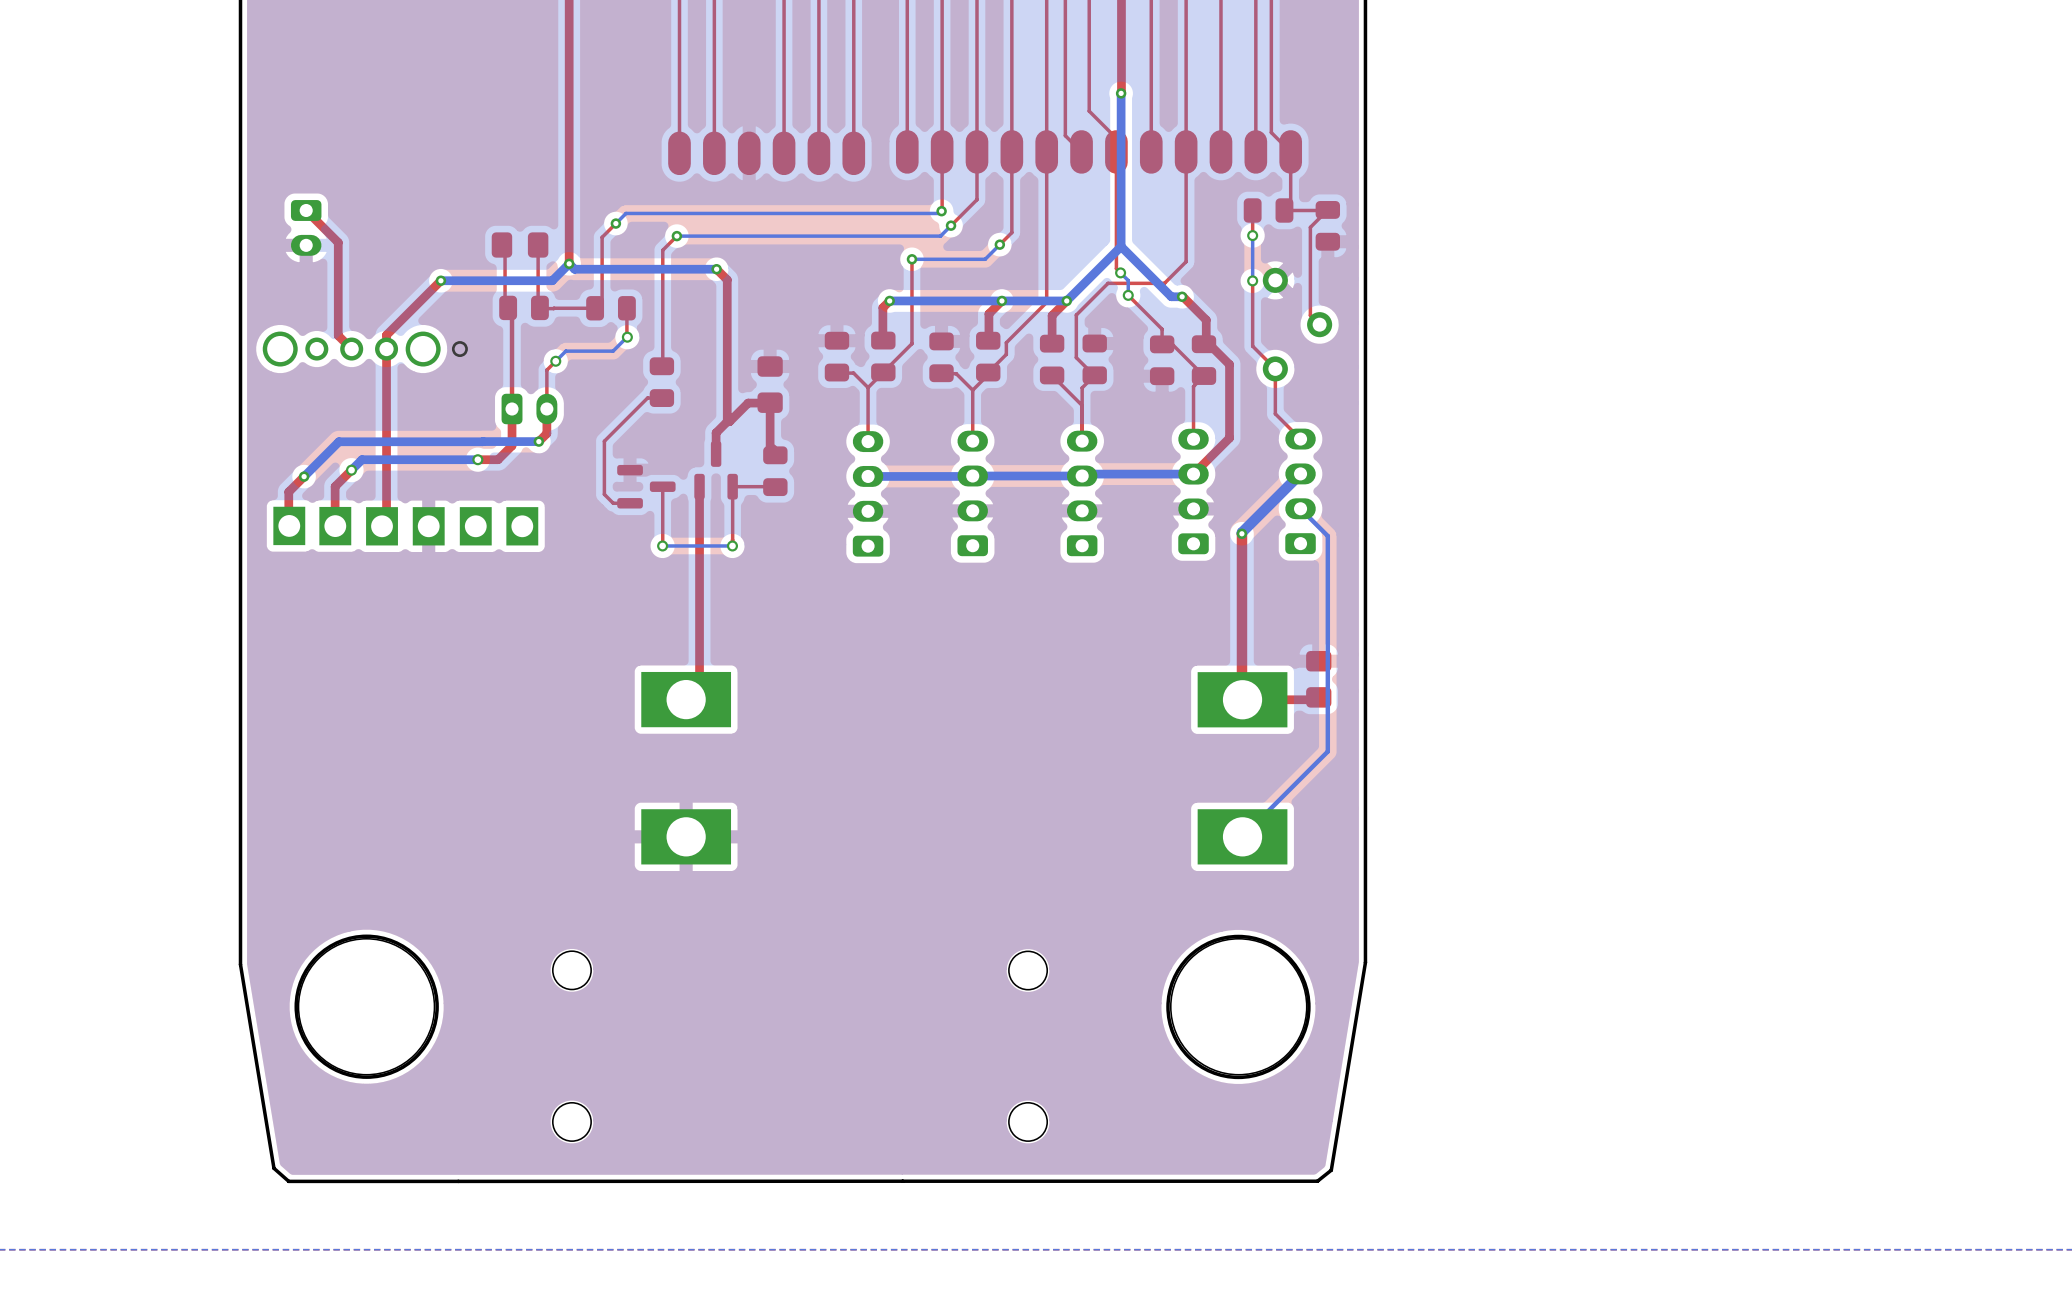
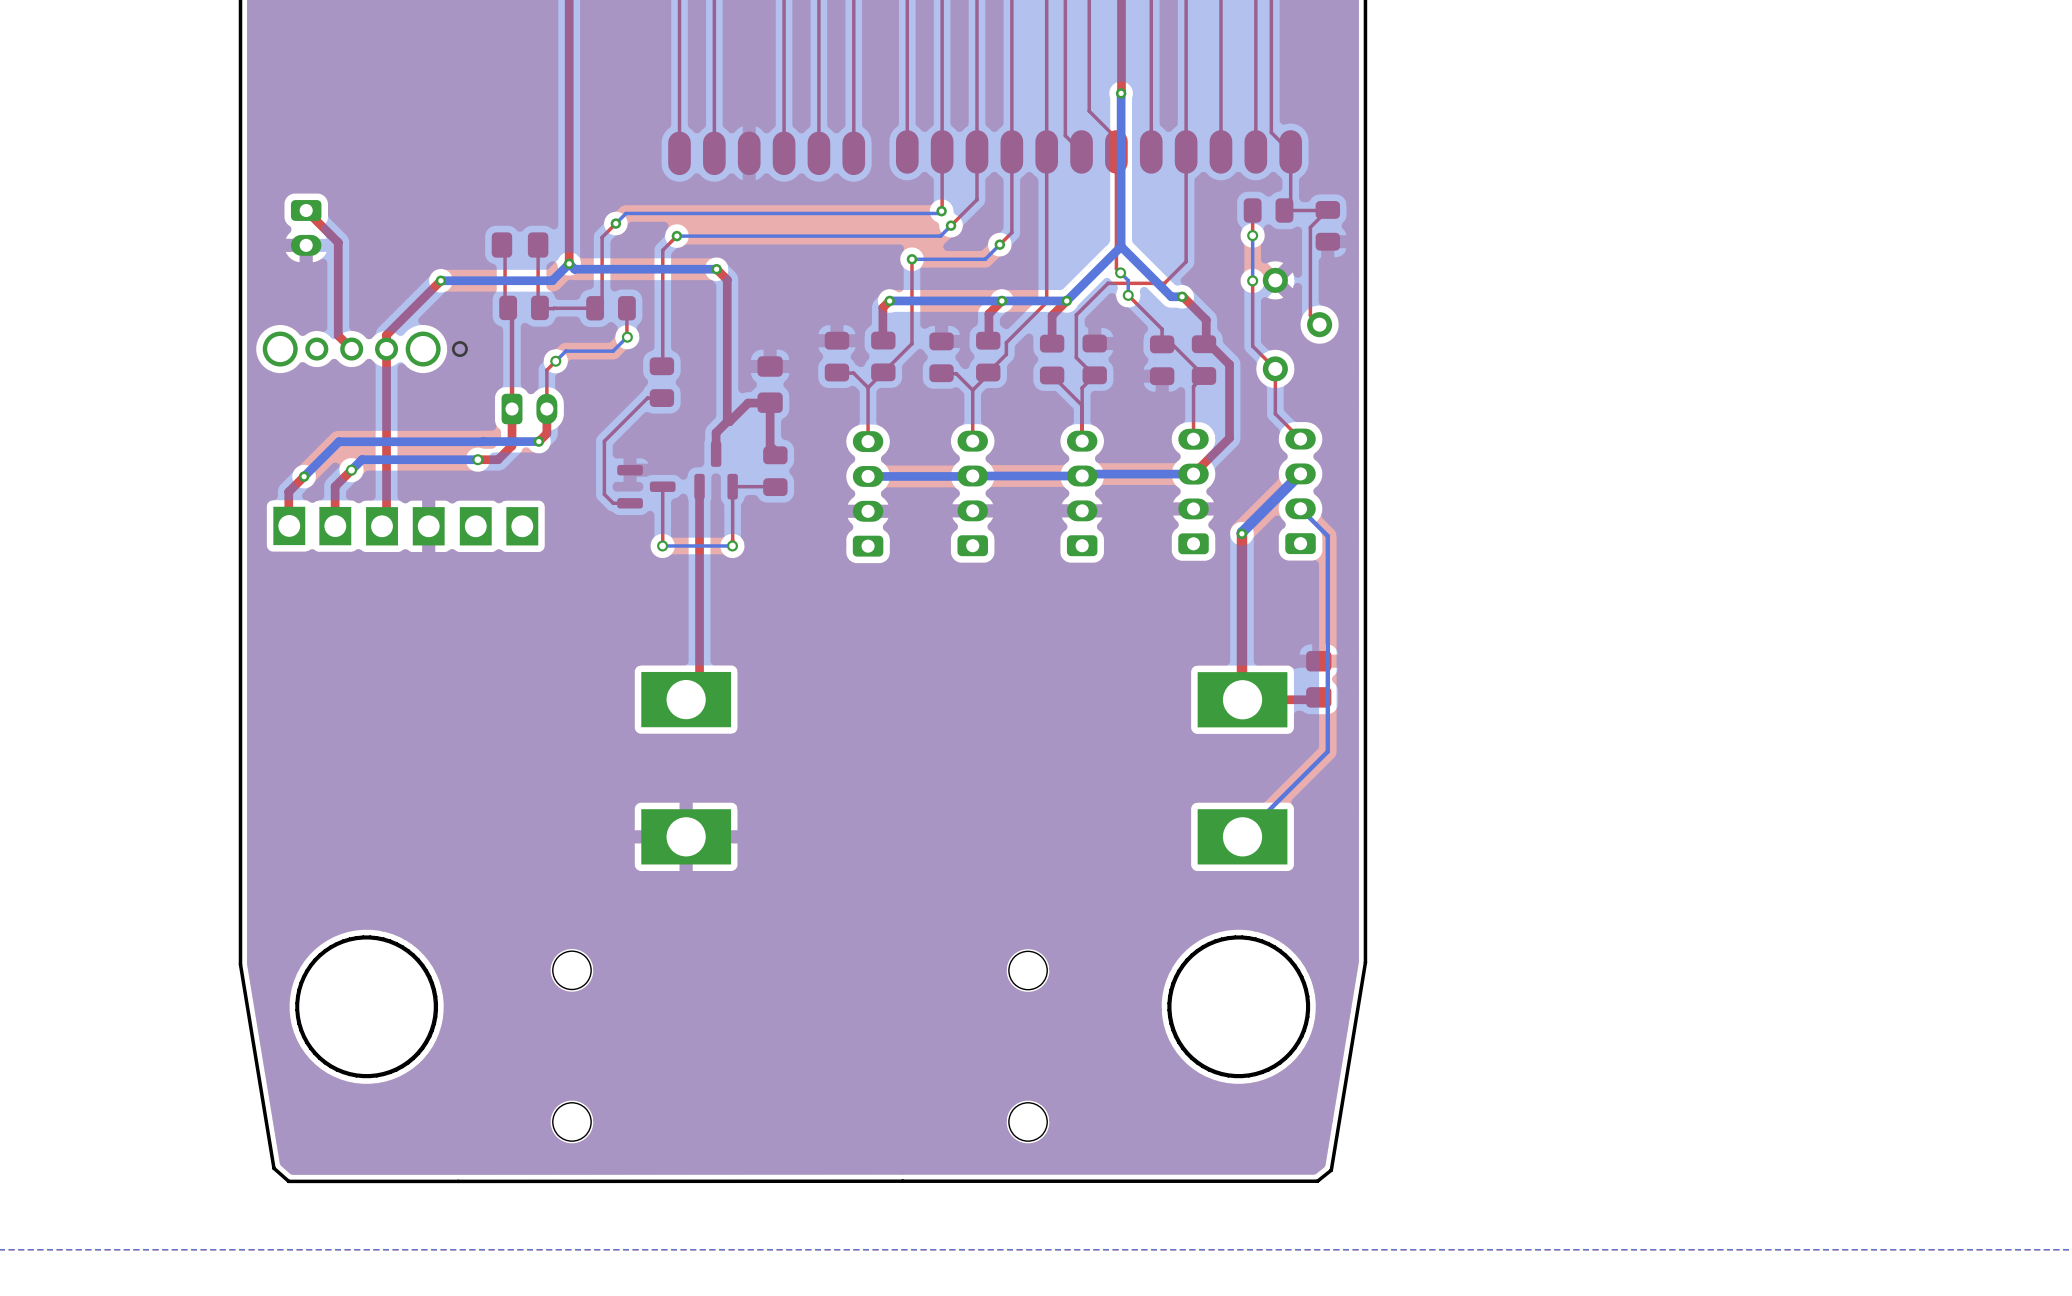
round board edge: [294, 934, 439, 1079] -> none
round board edge: [1166, 934, 1311, 1080] -> none
board edge: none -> (370, 936) (342, 940) (319, 954) (302, 976) (296, 1003) (300, 1030) (314, 1054) (336, 1070) (363, 1077) (390, 1073) (414, 1059) (430, 1036) (437, 1010) (433, 983) (418, 959) (396, 942) (370, 936)
board edge: none -> (1242, 936) (1268, 942) (1291, 959) (1305, 983) (1309, 1010) (1302, 1036) (1286, 1059) (1262, 1073) (1235, 1077) (1208, 1070) (1186, 1054) (1172, 1030) (1168, 1003) (1174, 976) (1191, 954) (1214, 940) (1242, 936)
board edge: none -> (370, 937) (343, 941) (320, 955) (304, 977) (297, 1003) (301, 1030) (315, 1053) (337, 1069) (363, 1075) (389, 1071) (412, 1057) (428, 1036) (435, 1010) (431, 983) (417, 960) (396, 944) (370, 937)
board edge: none -> (1242, 937) (1268, 944) (1289, 960) (1303, 983) (1307, 1010) (1301, 1036) (1285, 1057) (1261, 1071) (1235, 1075) (1209, 1069) (1187, 1053) (1173, 1030) (1169, 1003) (1176, 977) (1192, 955) (1215, 941) (1242, 937)

